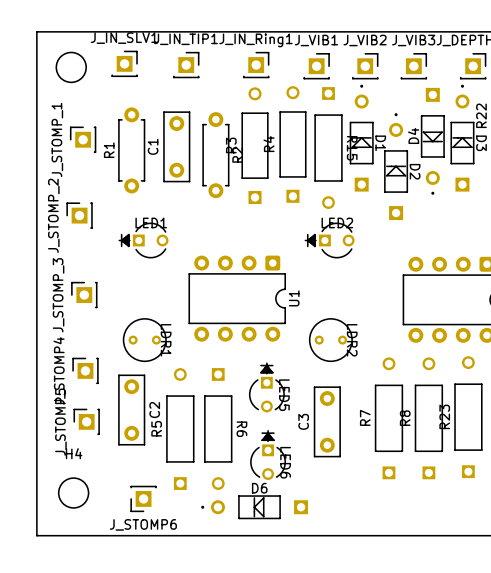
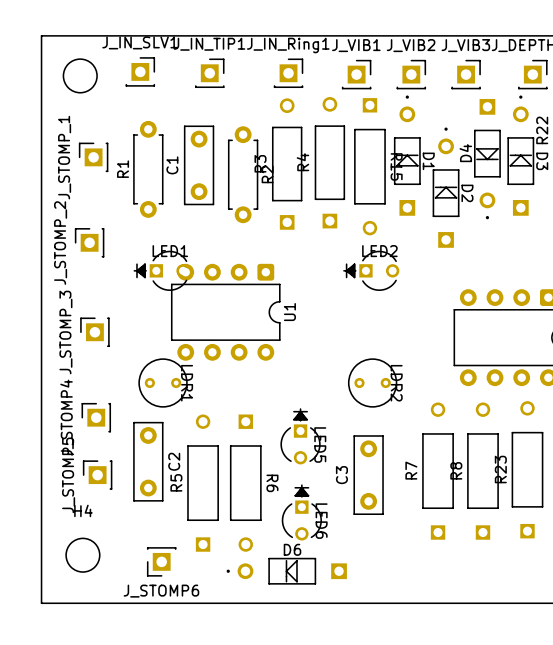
U1 position: (237, 298) -> (225, 312)

